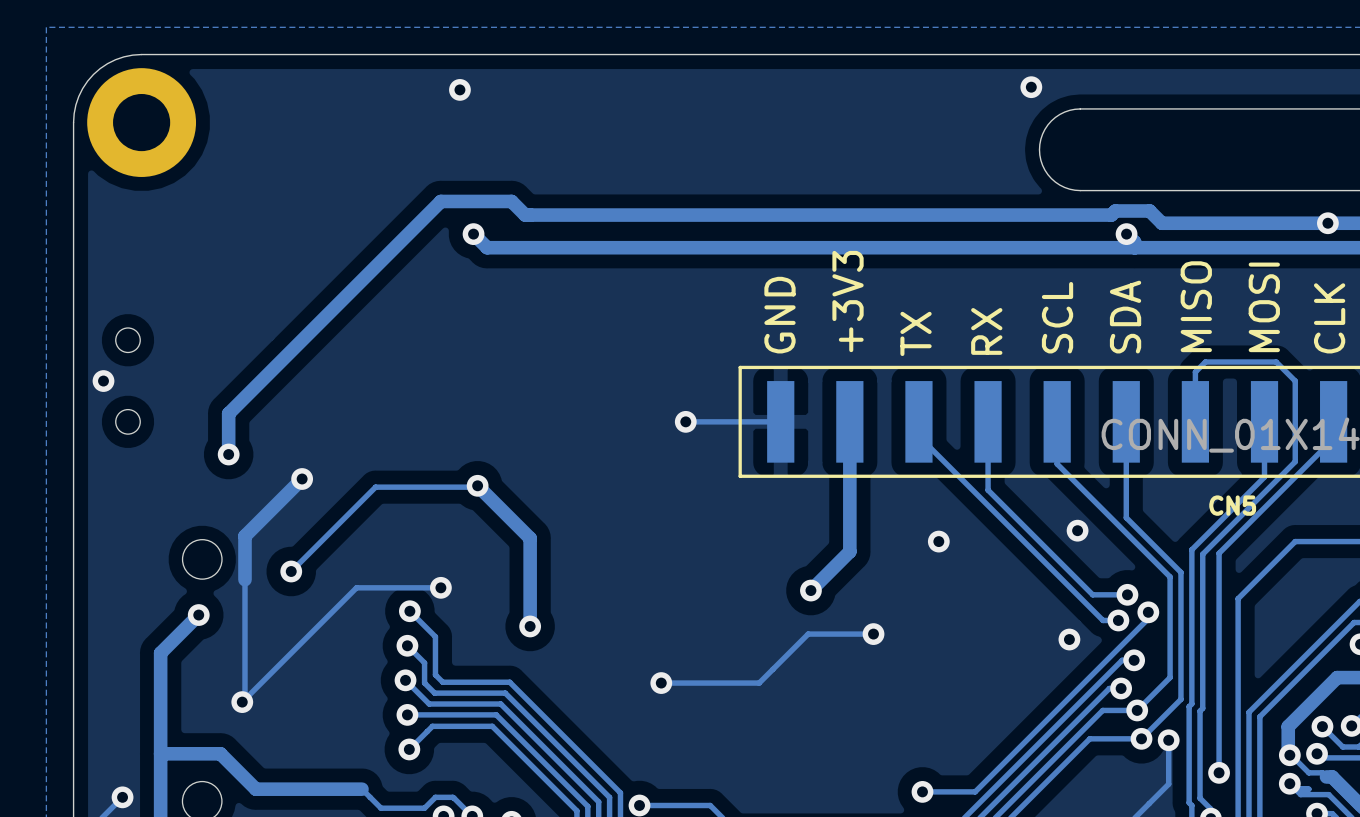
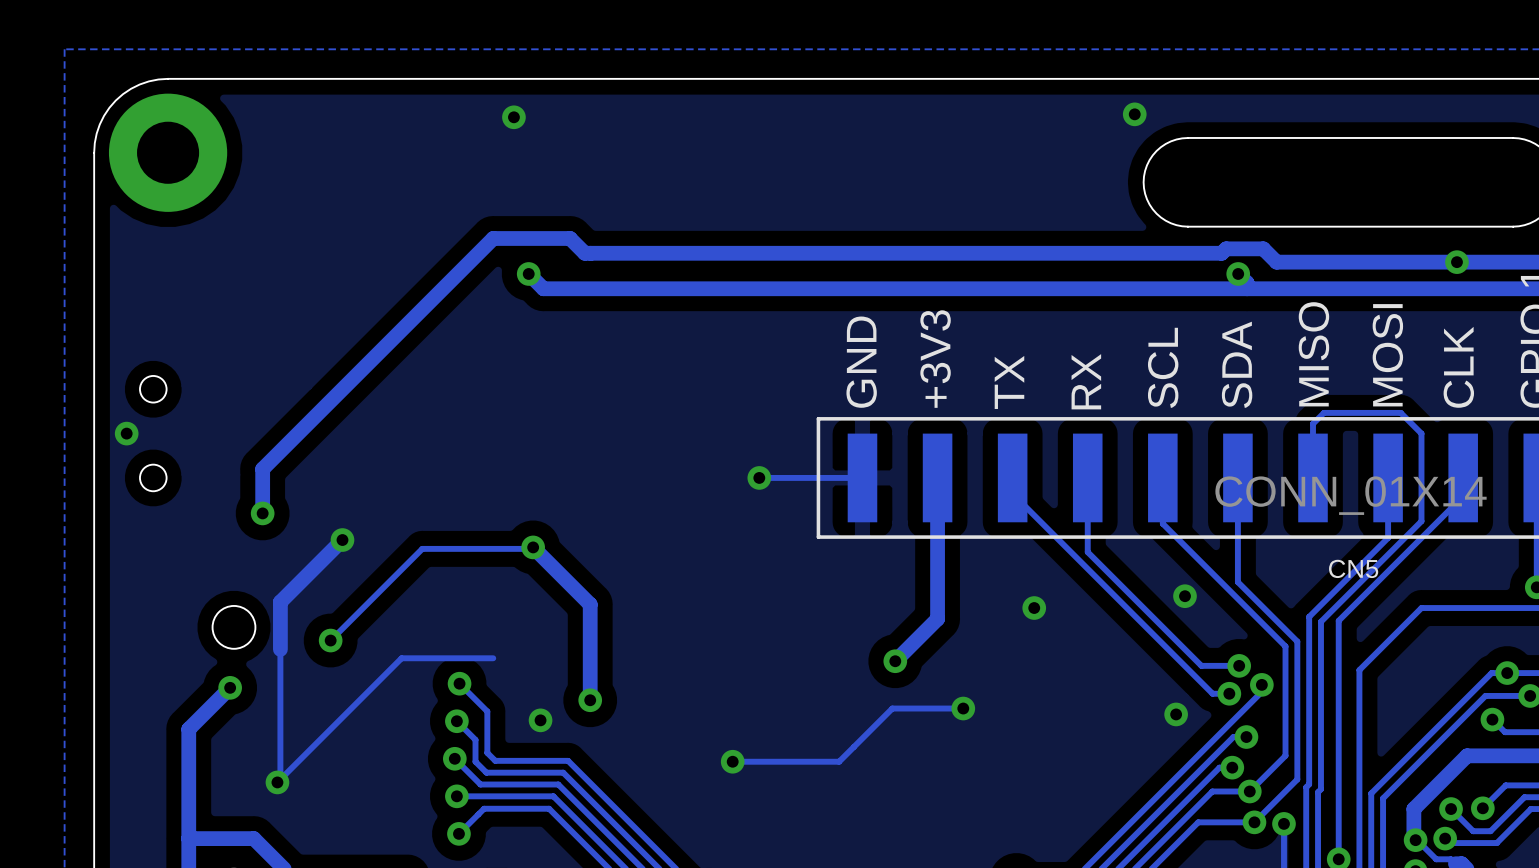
via position: (440, 587) -> (540, 720)

